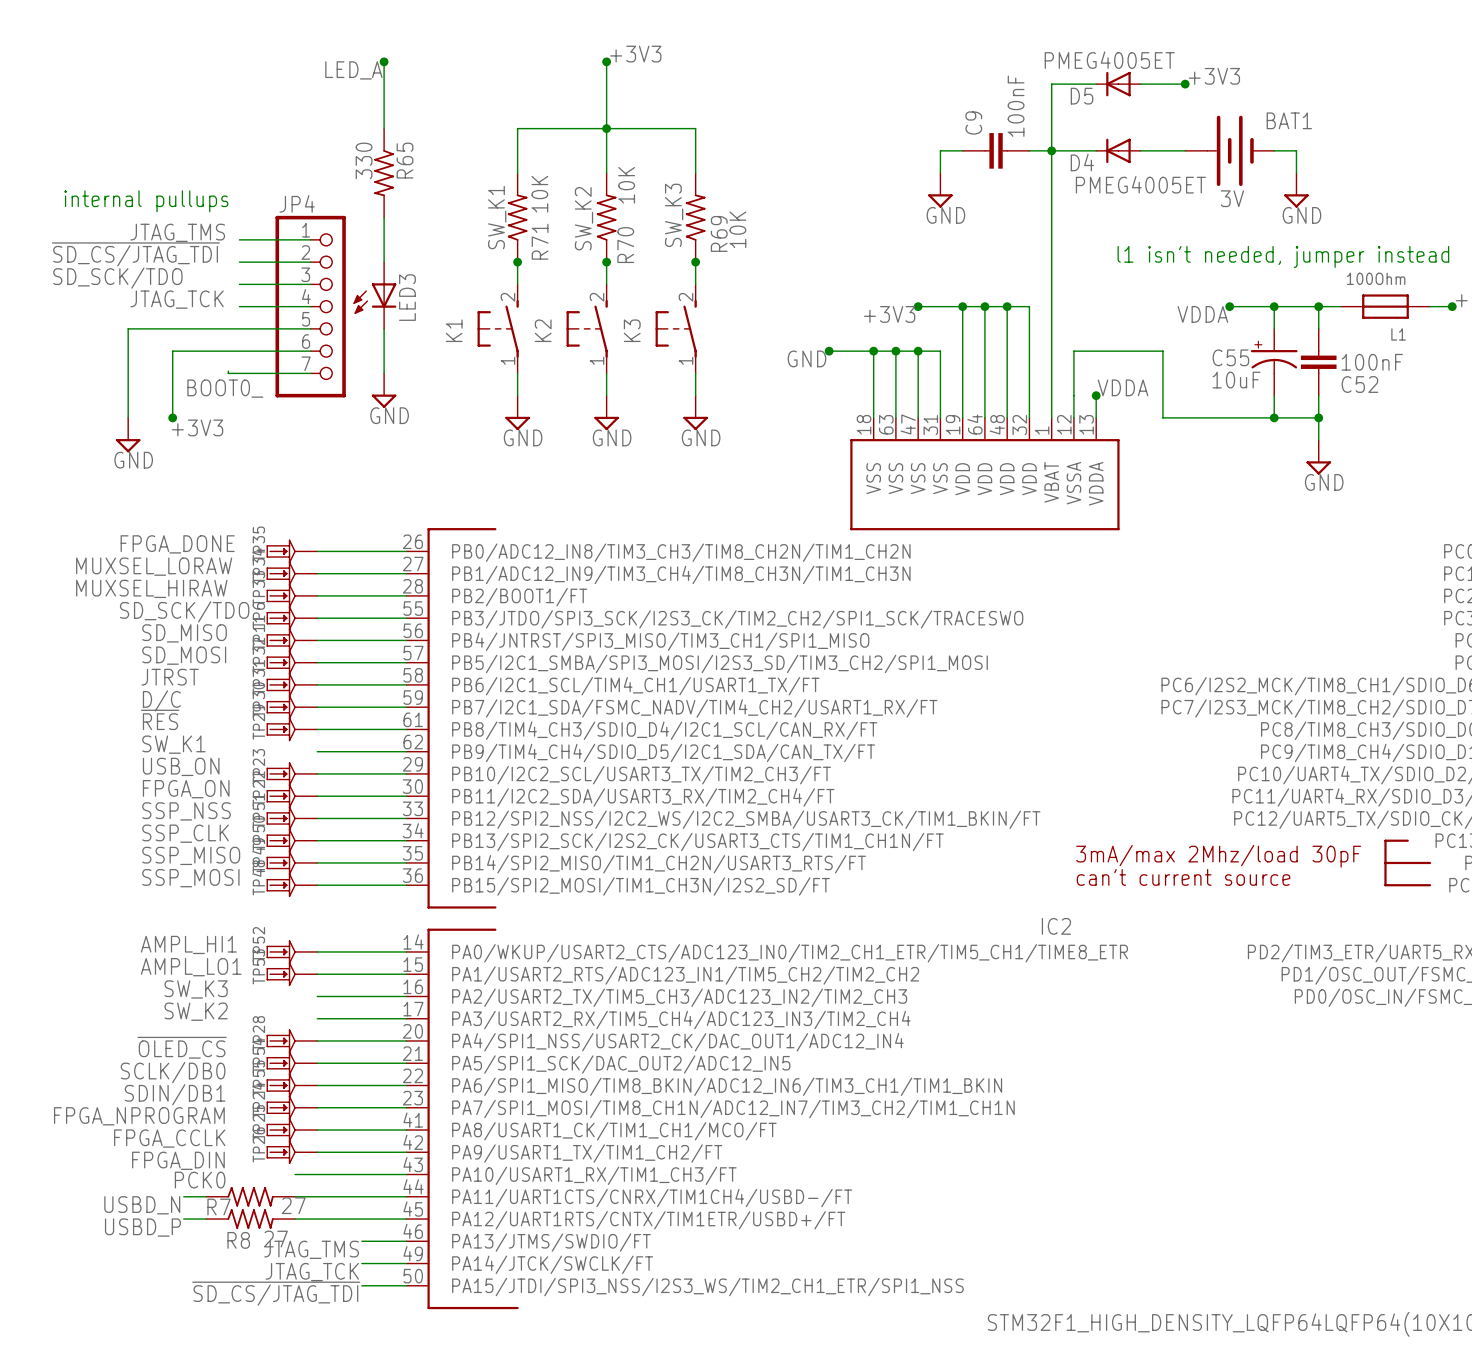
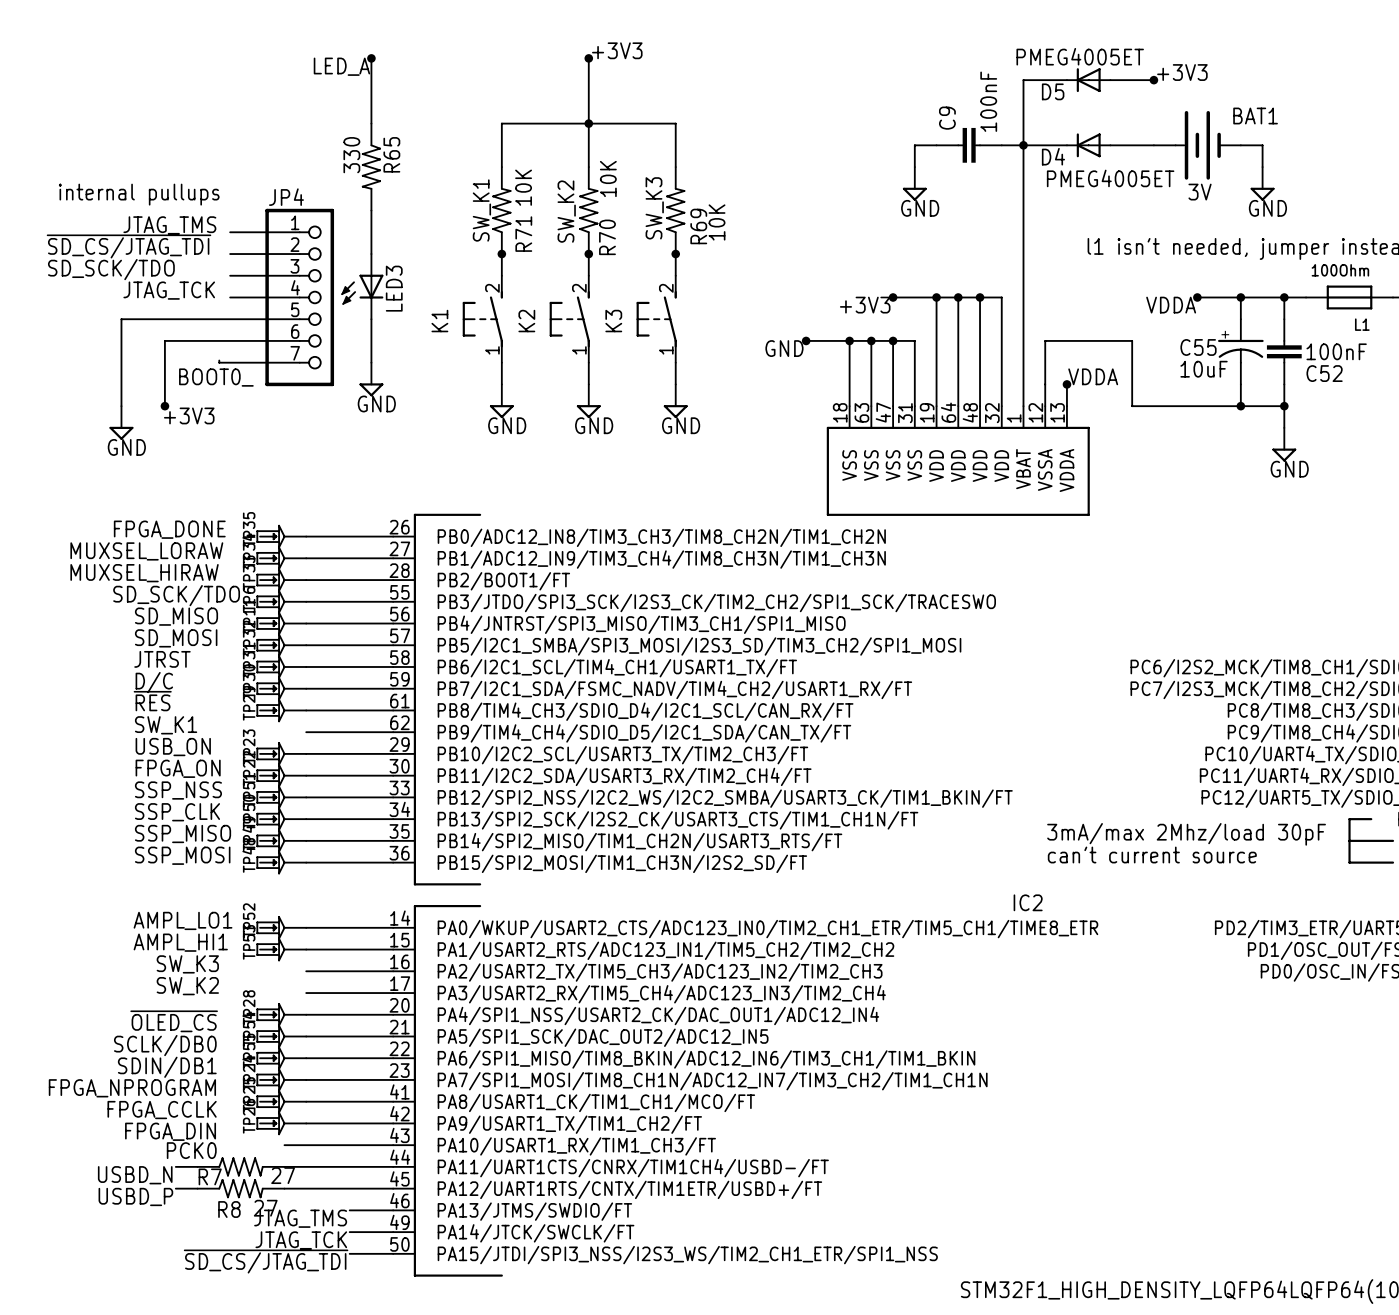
label: AMPL_HI1 (188, 944) -> AMPL_LO1 (183, 920)
label: AMPL_LO1 (191, 967) -> AMPL_HI1 (180, 942)

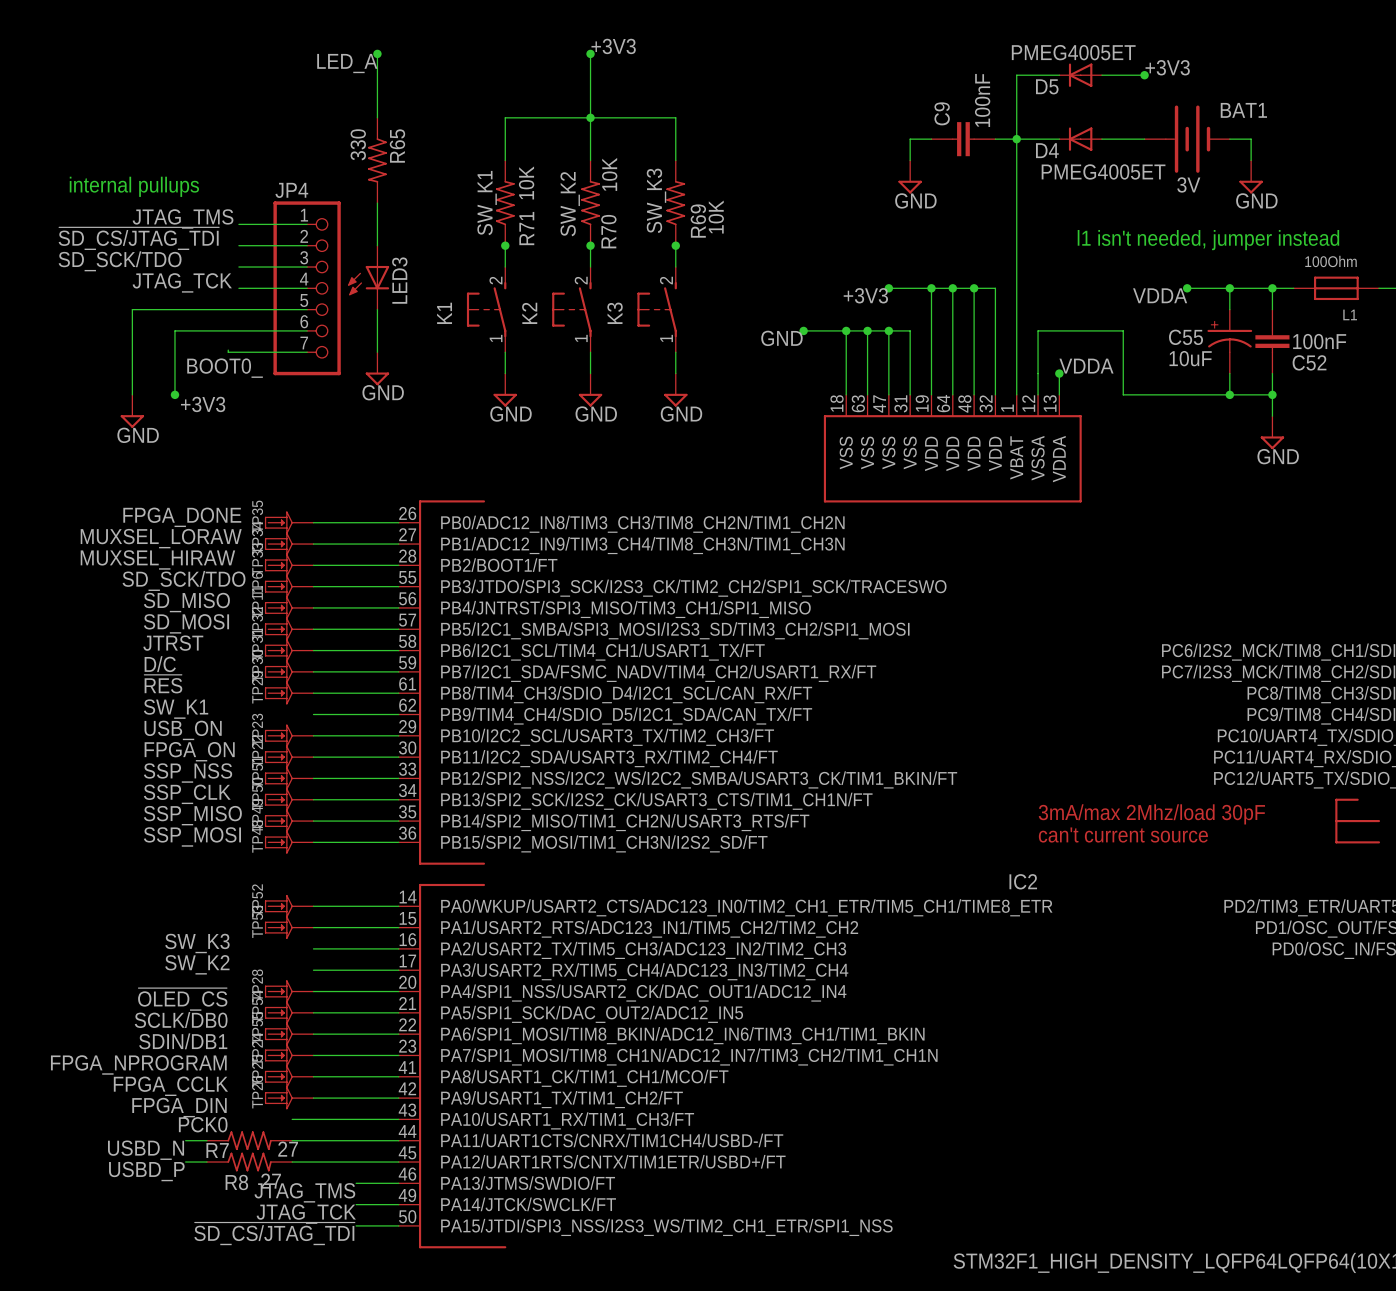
label: AMPL_LO1 (183, 920) -> none
label: AMPL_HI1 (180, 942) -> none
IC2 pin name: PA6/SPI1_MISO/TIM8_BKIN/ADC12_IN6/TIM3_CH1/TIM1_BKIN (706, 1059) -> PA6/SPI1_MOSI/TIM8_BKIN/ADC12_IN6/TIM3_CH1/TIM1_BKIN (682, 1035)

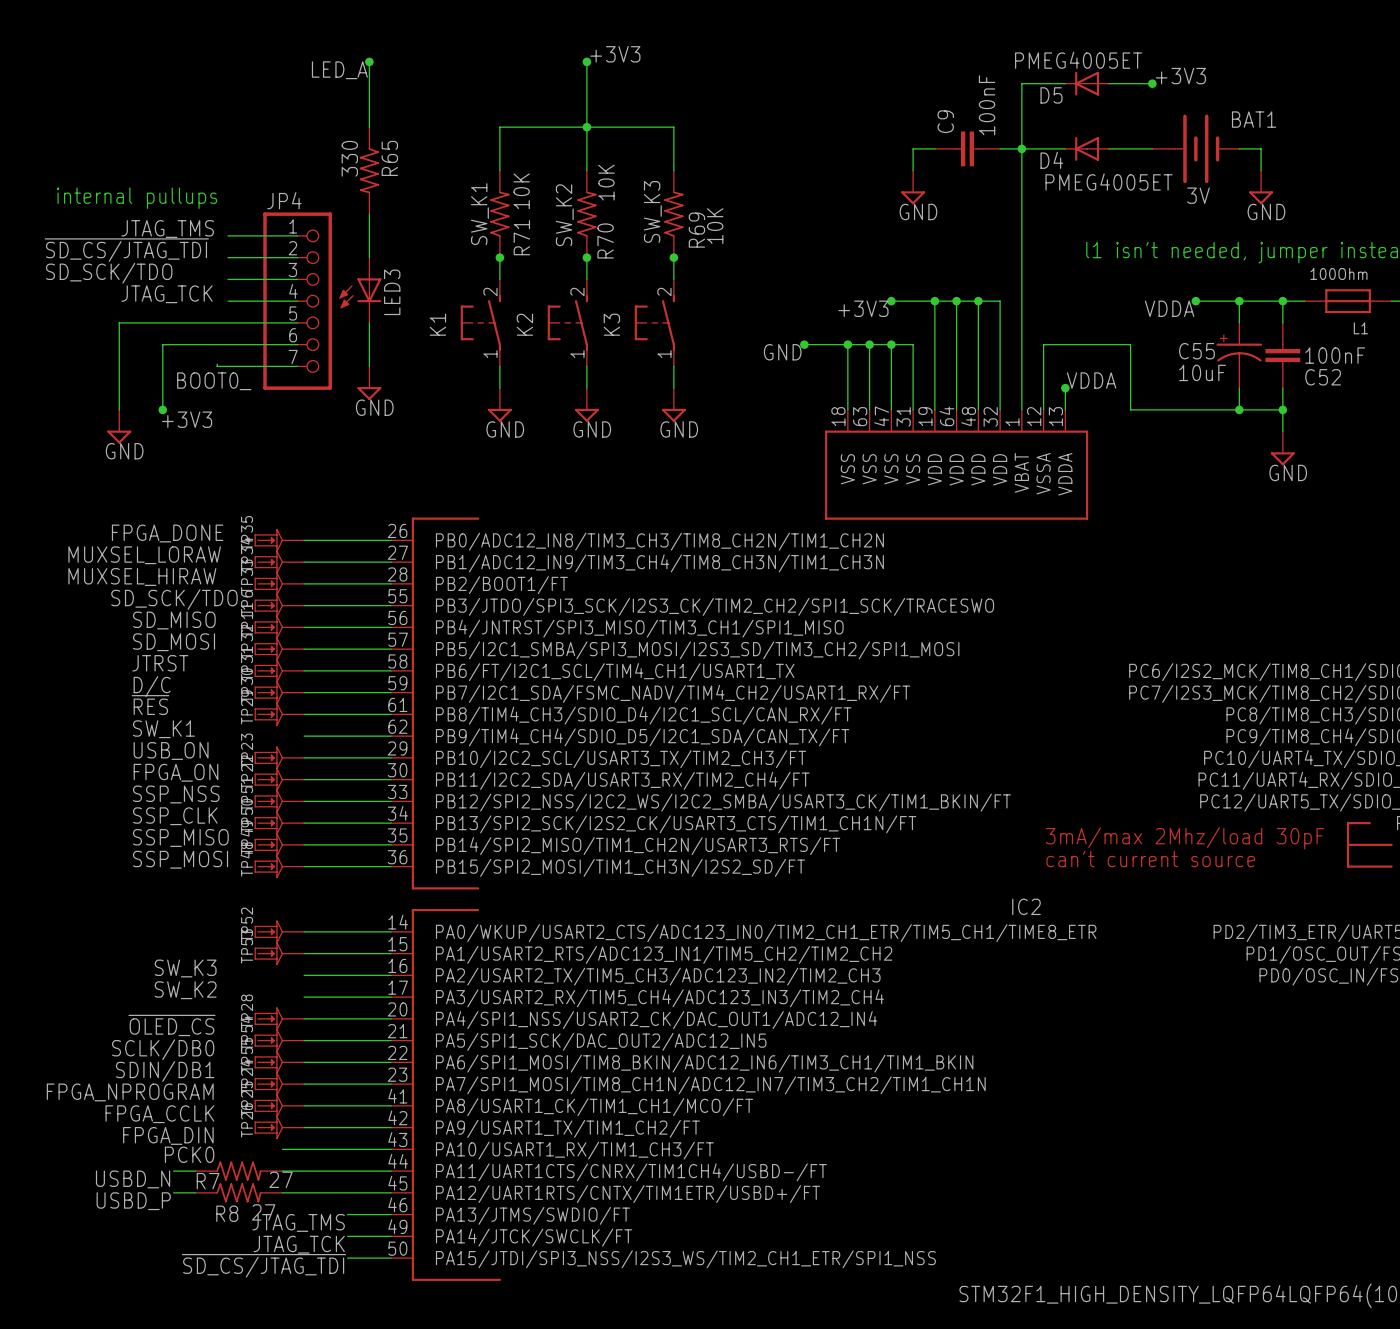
IC2 pin name: PB6/I2C1_SCL/TIM4_CH1/USART1_TX/FT (602, 652) -> PB6/FT/I2C1_SCL/TIM4_CH1/USART1_TX (615, 672)

